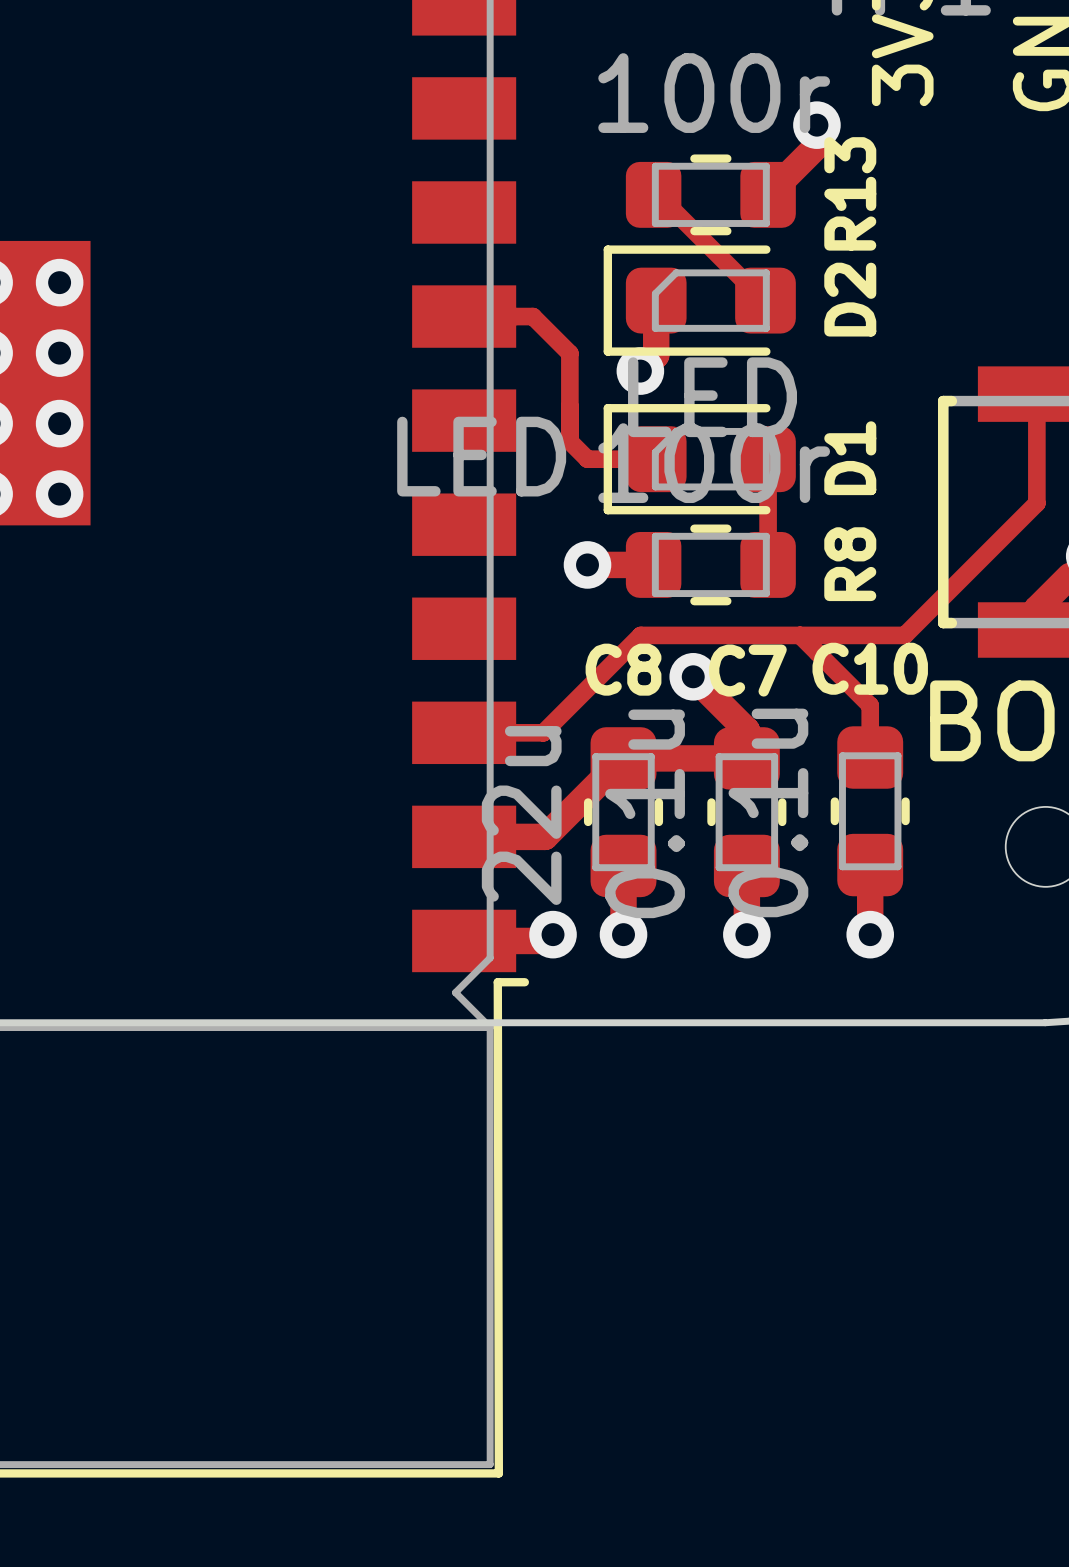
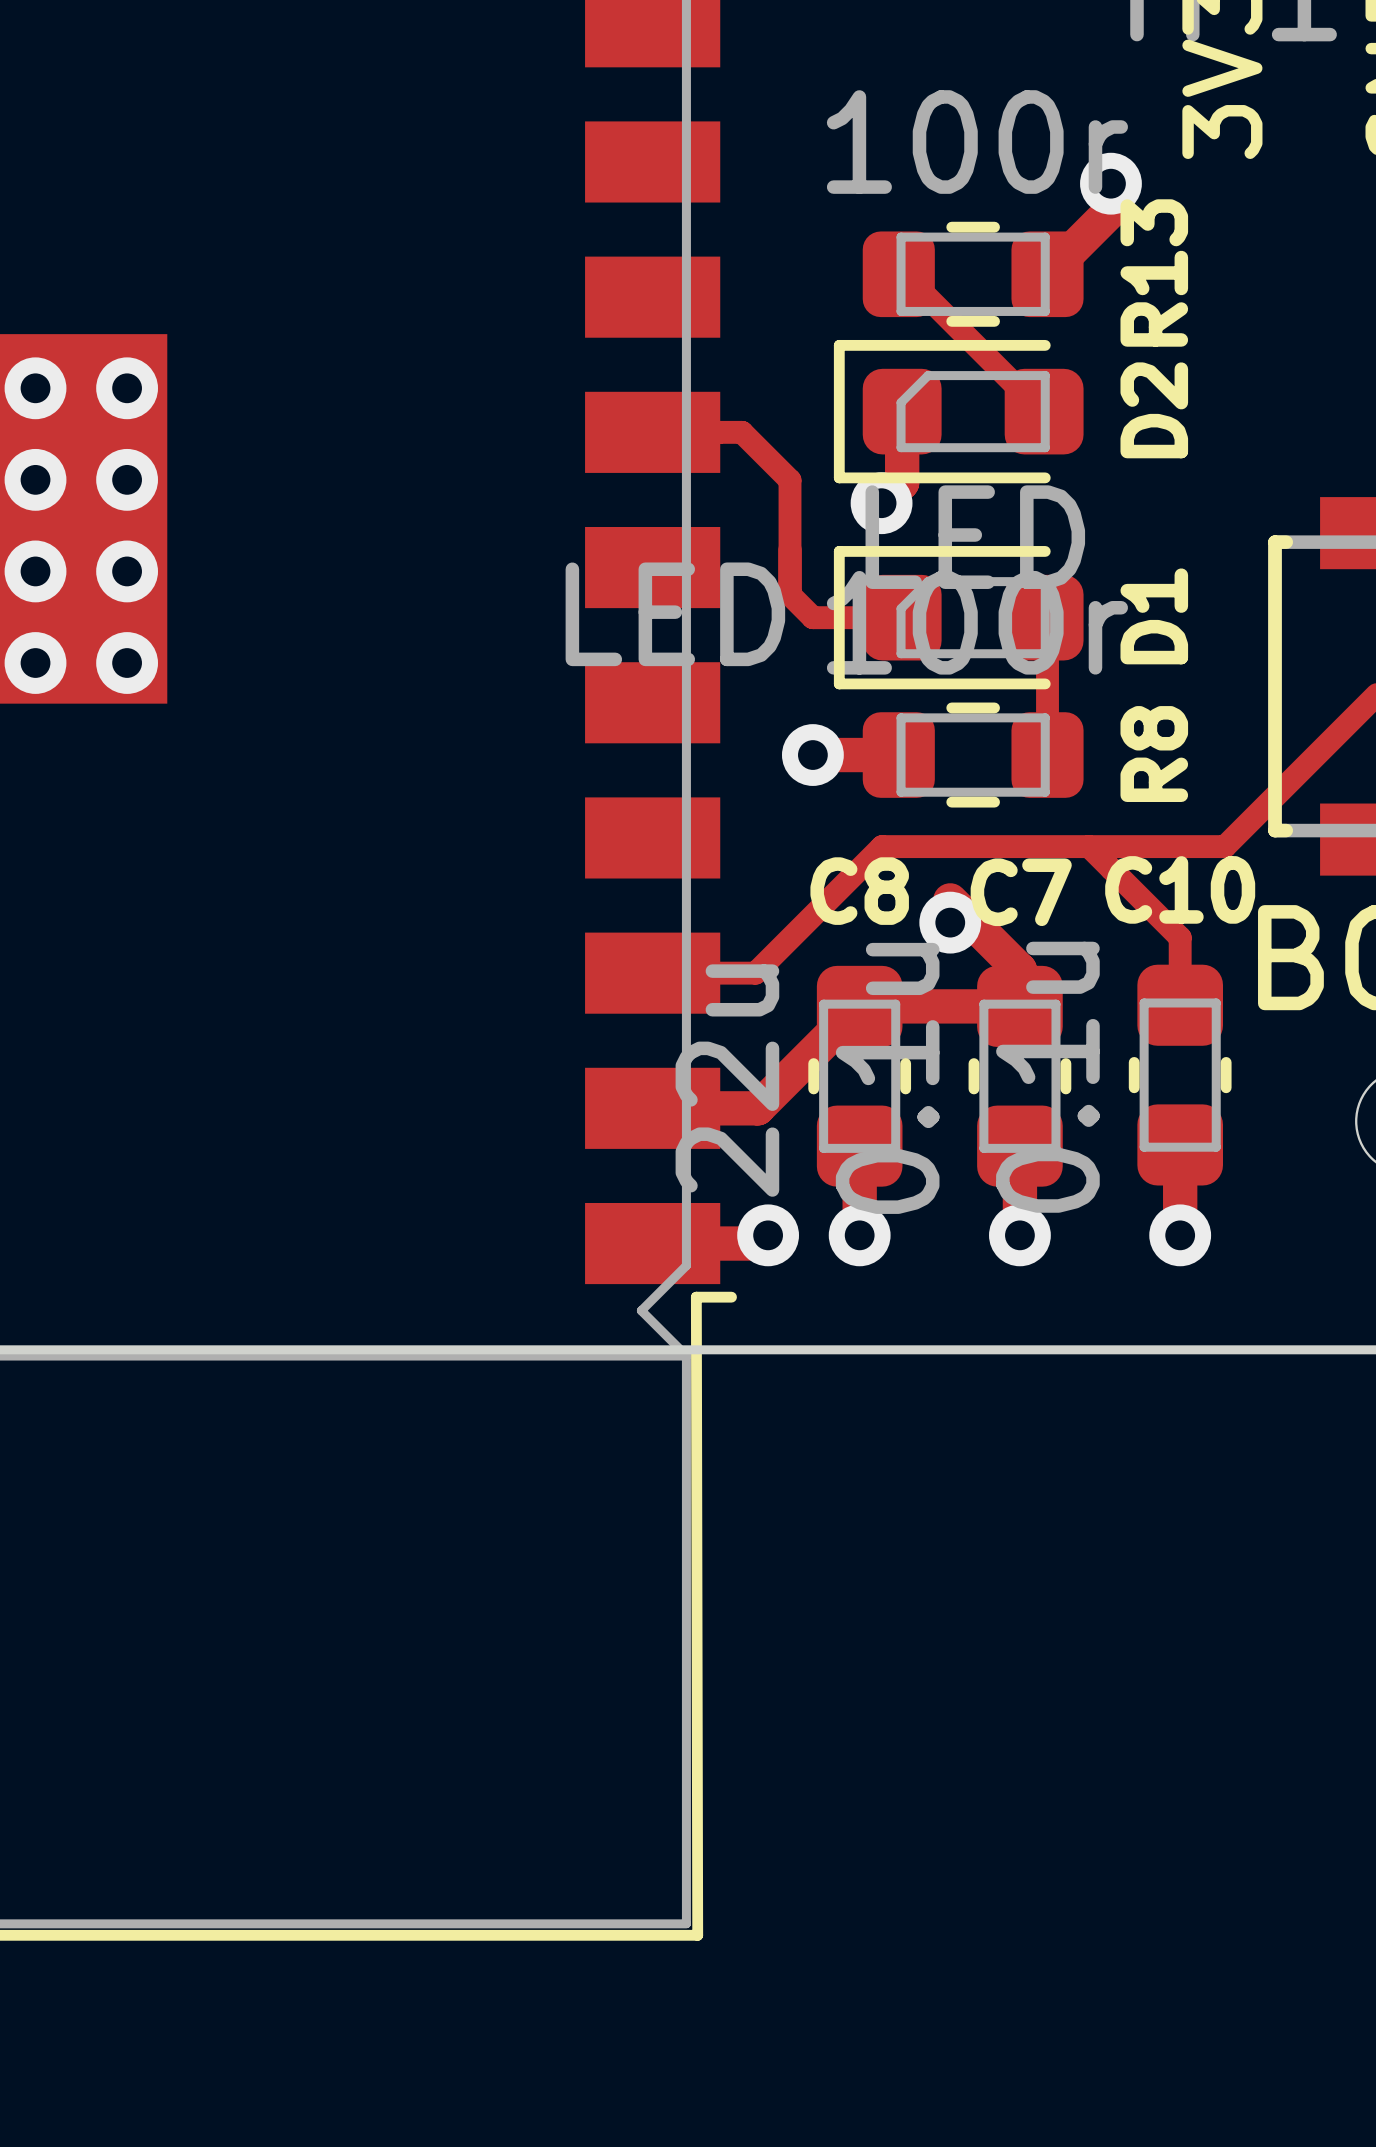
via position: (693, 676) -> (950, 922)

